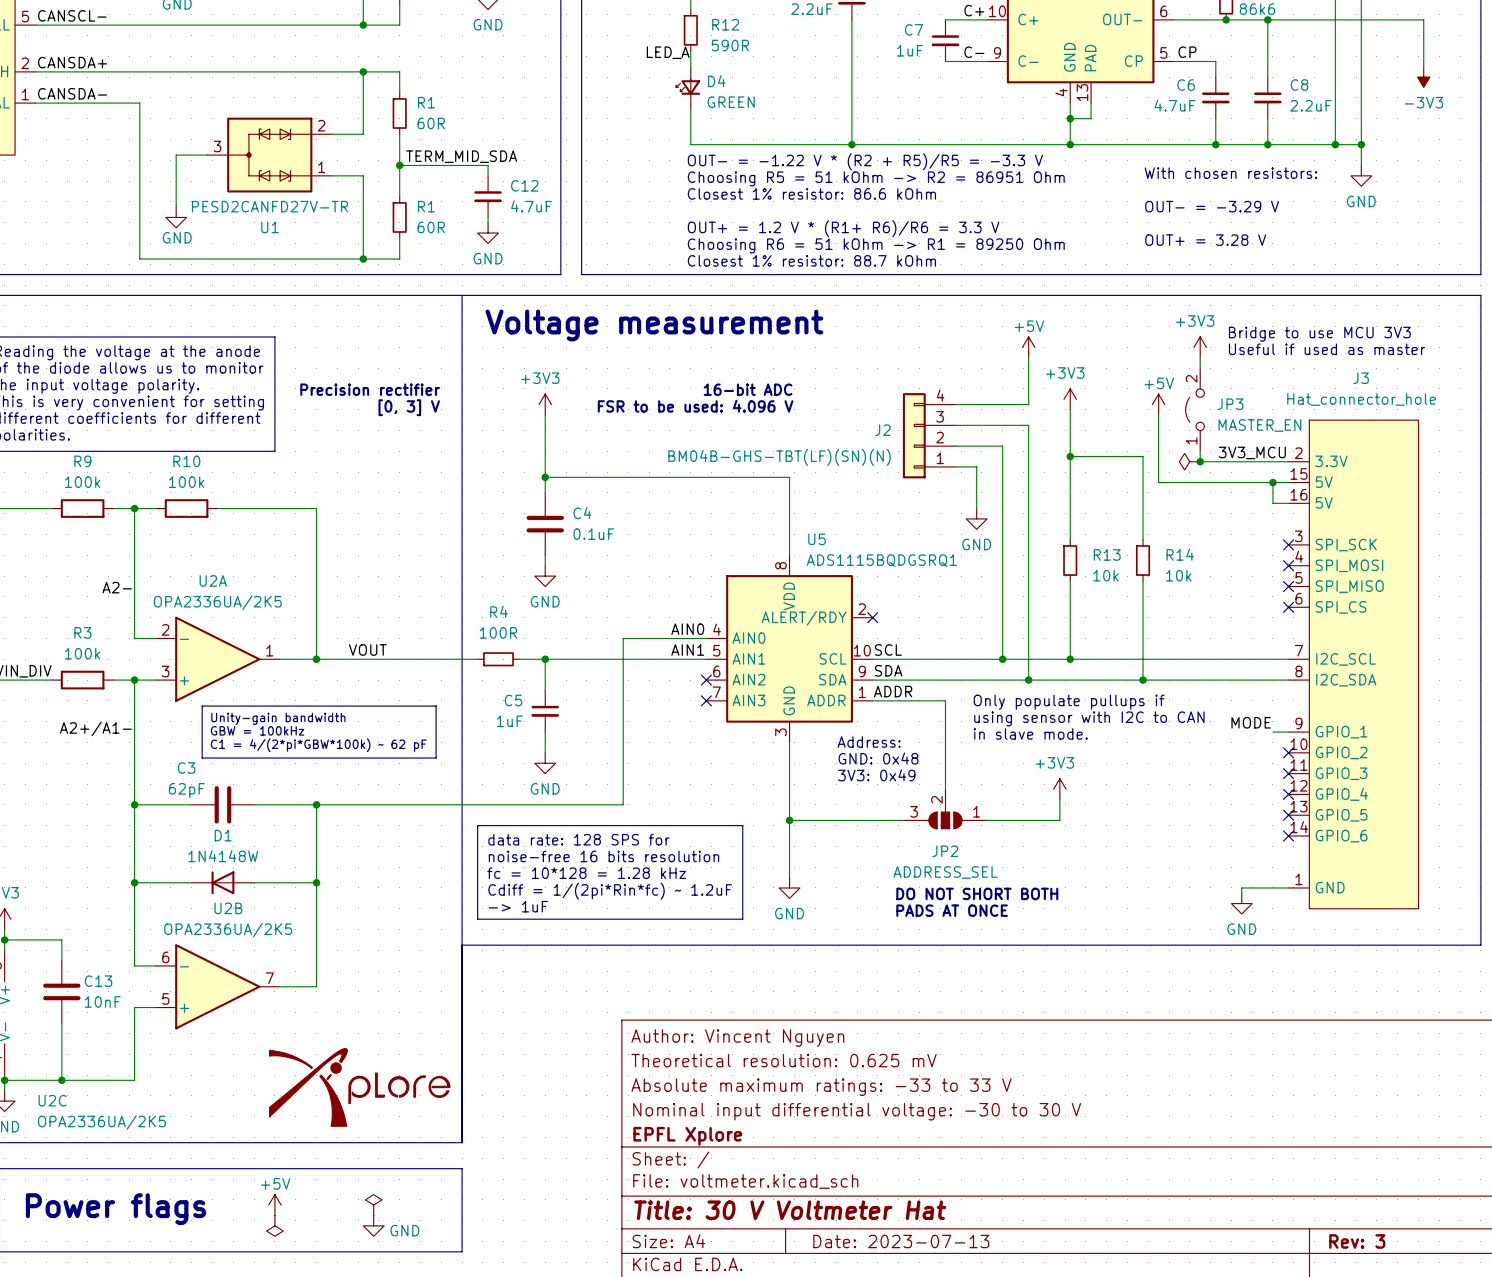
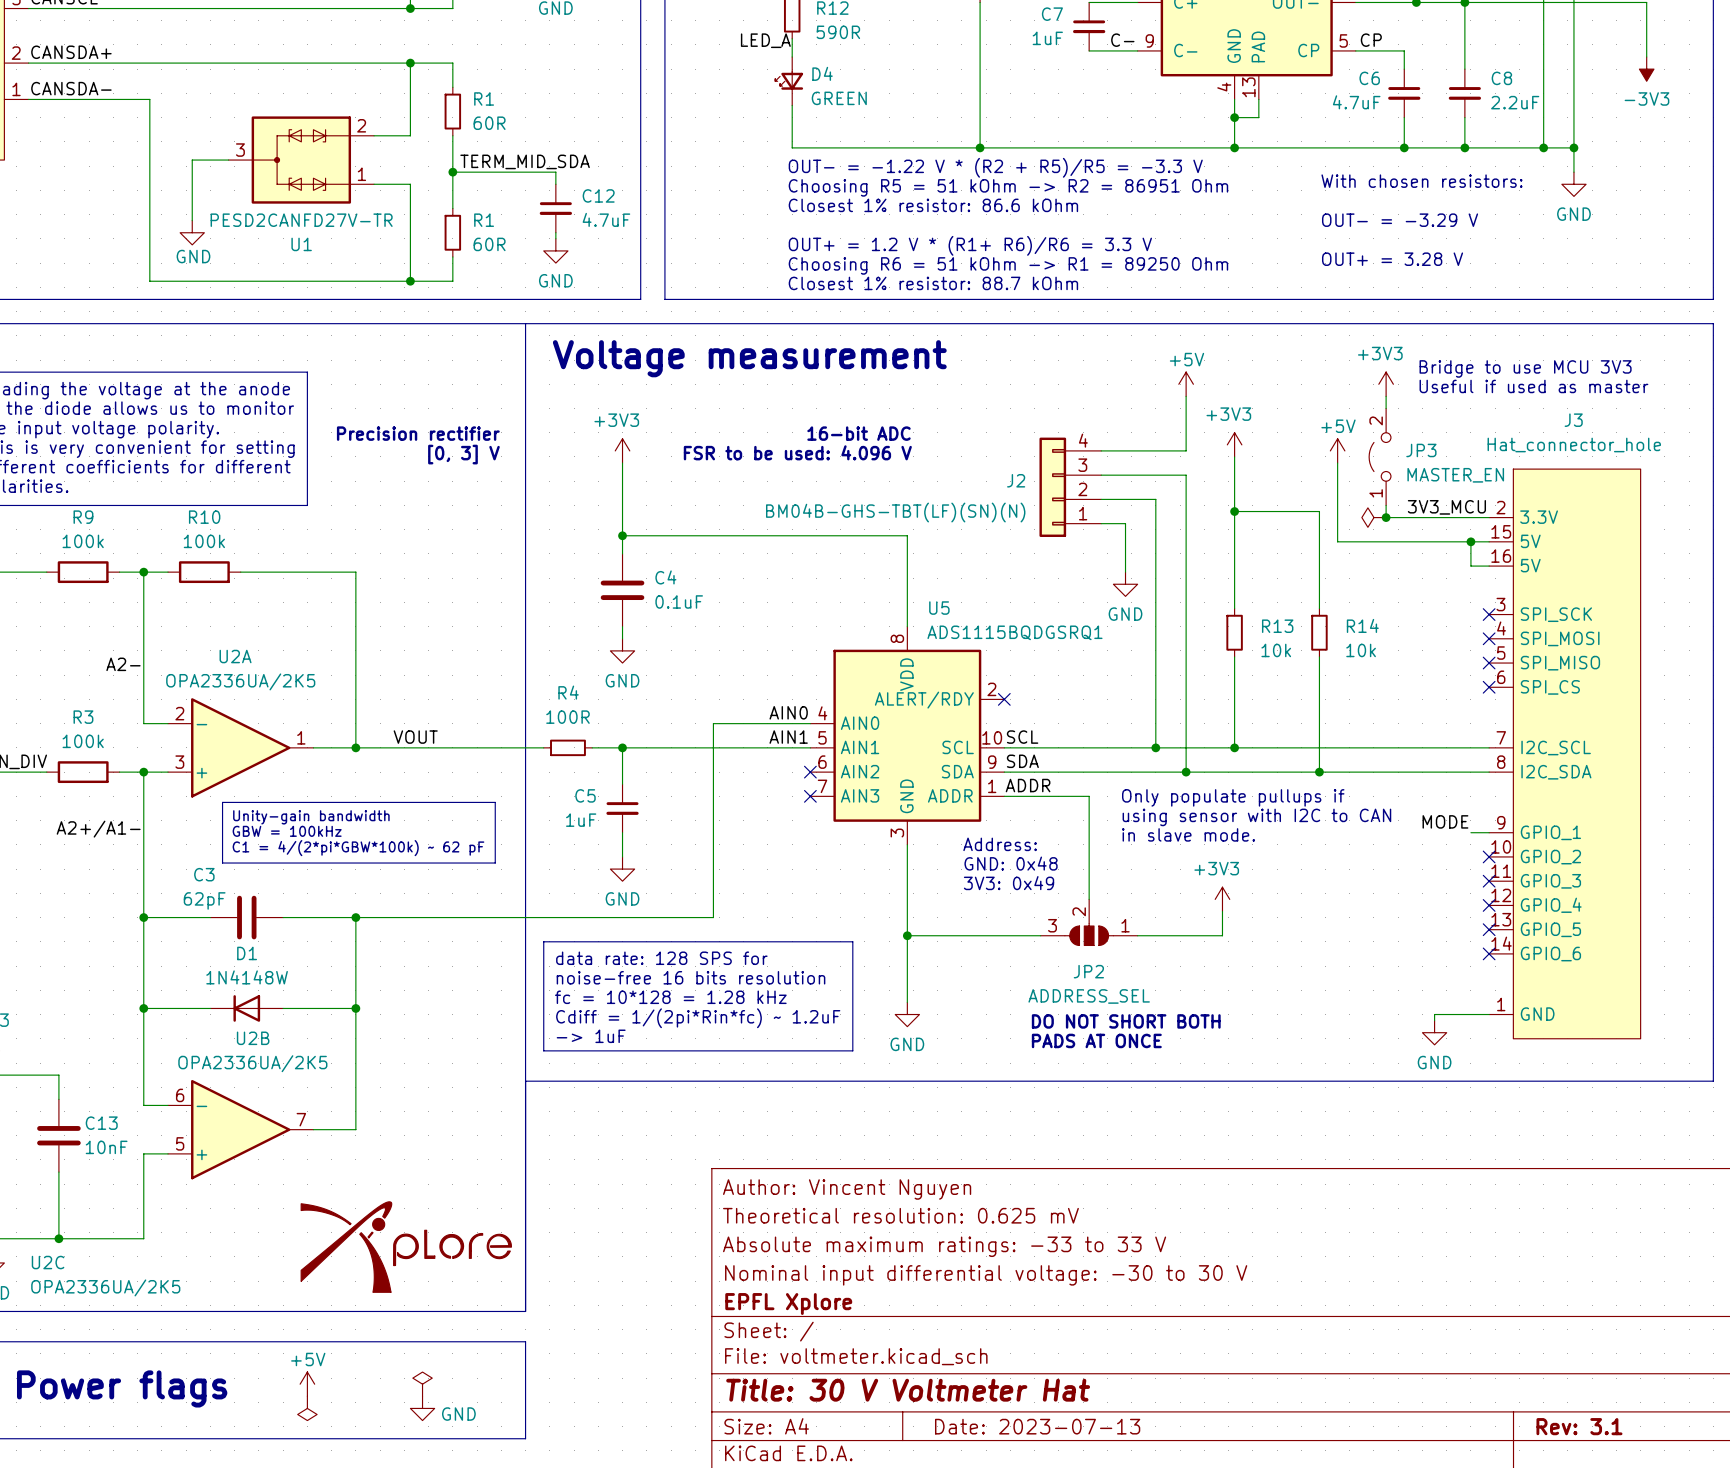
title block: Rev: 3 (1357, 1241) -> Rev: 3.1 (1579, 1426)

